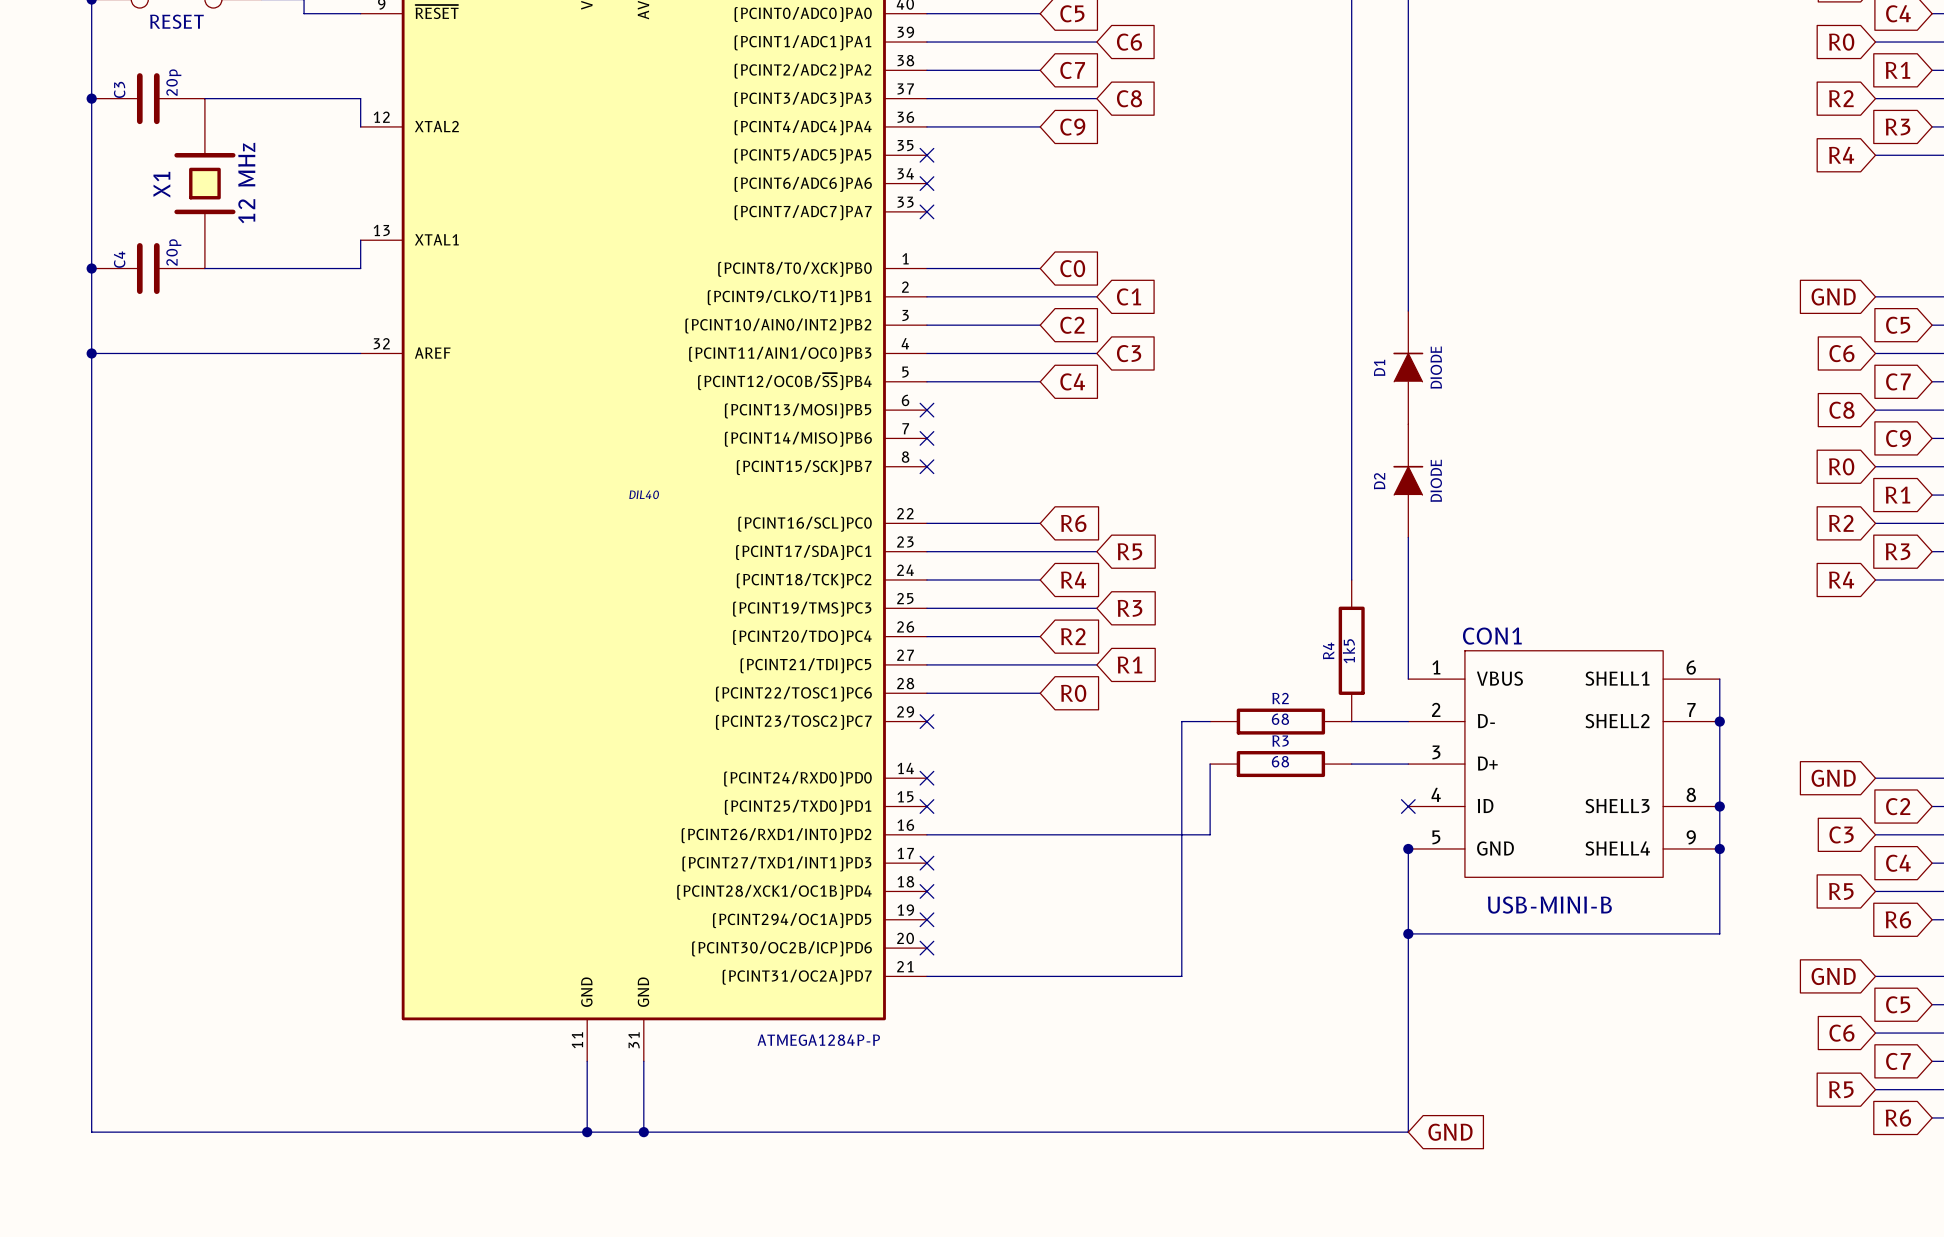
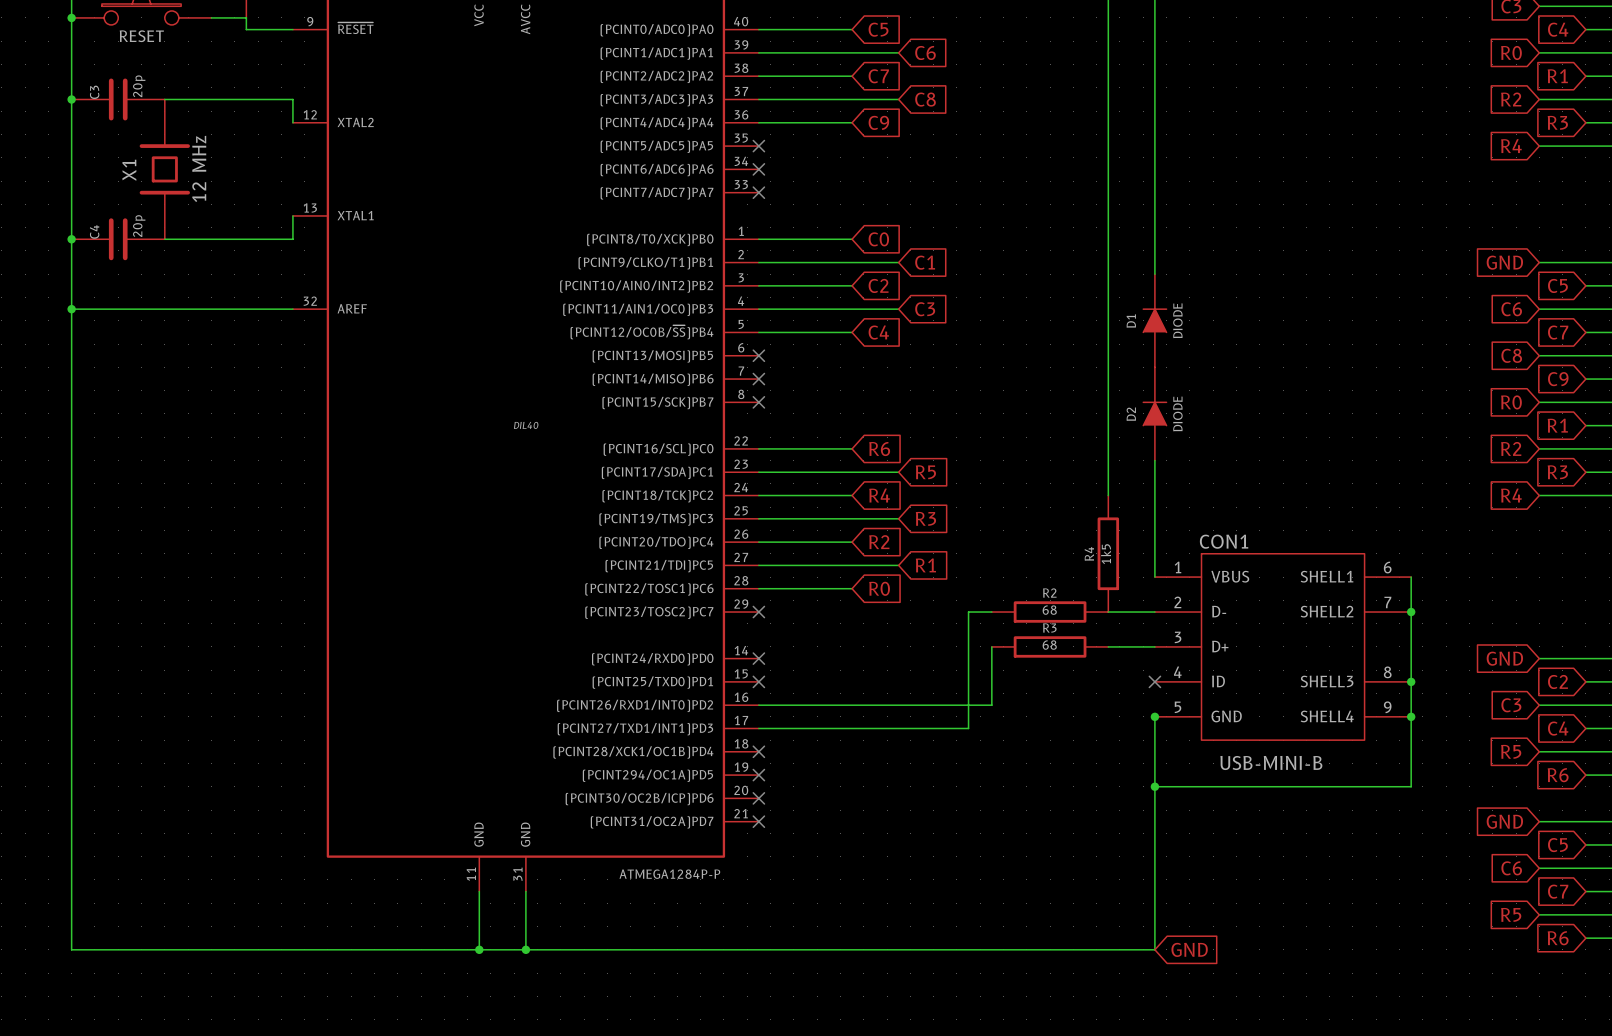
no-connect mark: (926, 863) -> none
wire: (1181, 863) (1181, 976) (926, 976) -> (968, 728) (758, 728)
no-connect mark: none -> (758, 821)

